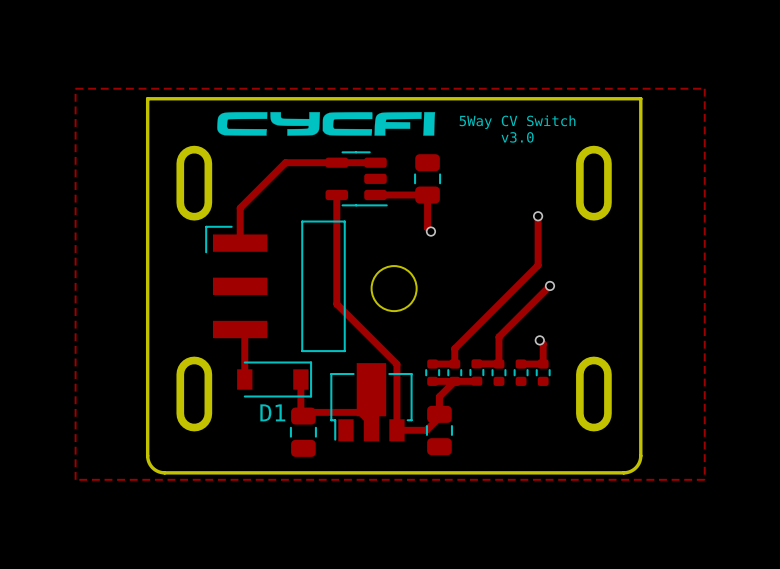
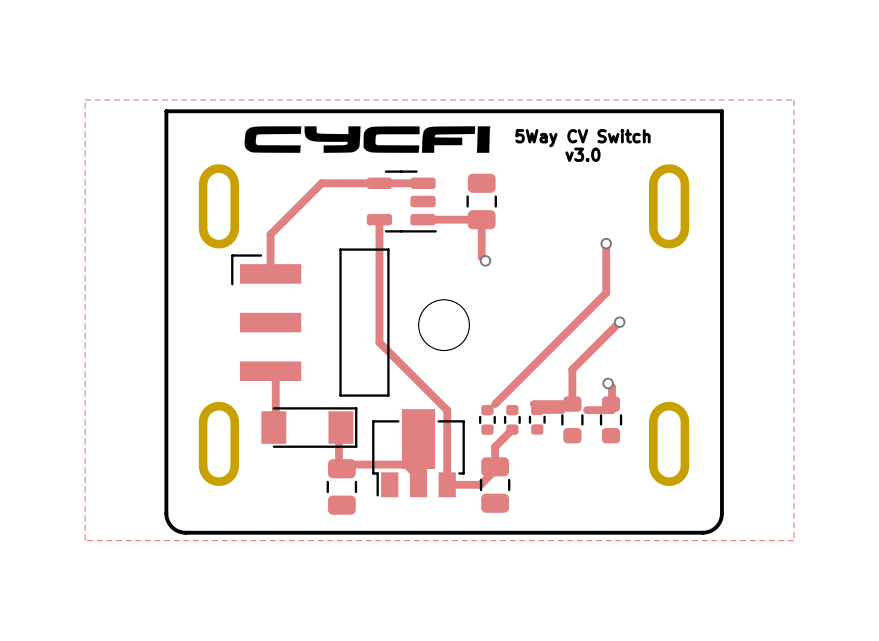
track: (538, 260) (538, 265) (454, 348) (454, 364) (432, 364) -> (606, 292) (495, 404)
track: (508, 327) (498, 336) (498, 364) -> (572, 369) (572, 404) (533, 404)
part footprint: [535, 359, 551, 386] -> [599, 396, 623, 444]
part: (498, 372) -> none
part: none -> (572, 419)
part: (521, 372) -> none
D1: (274, 379) -> none
part: none -> (309, 427)
track: (432, 381) (476, 381) -> none

